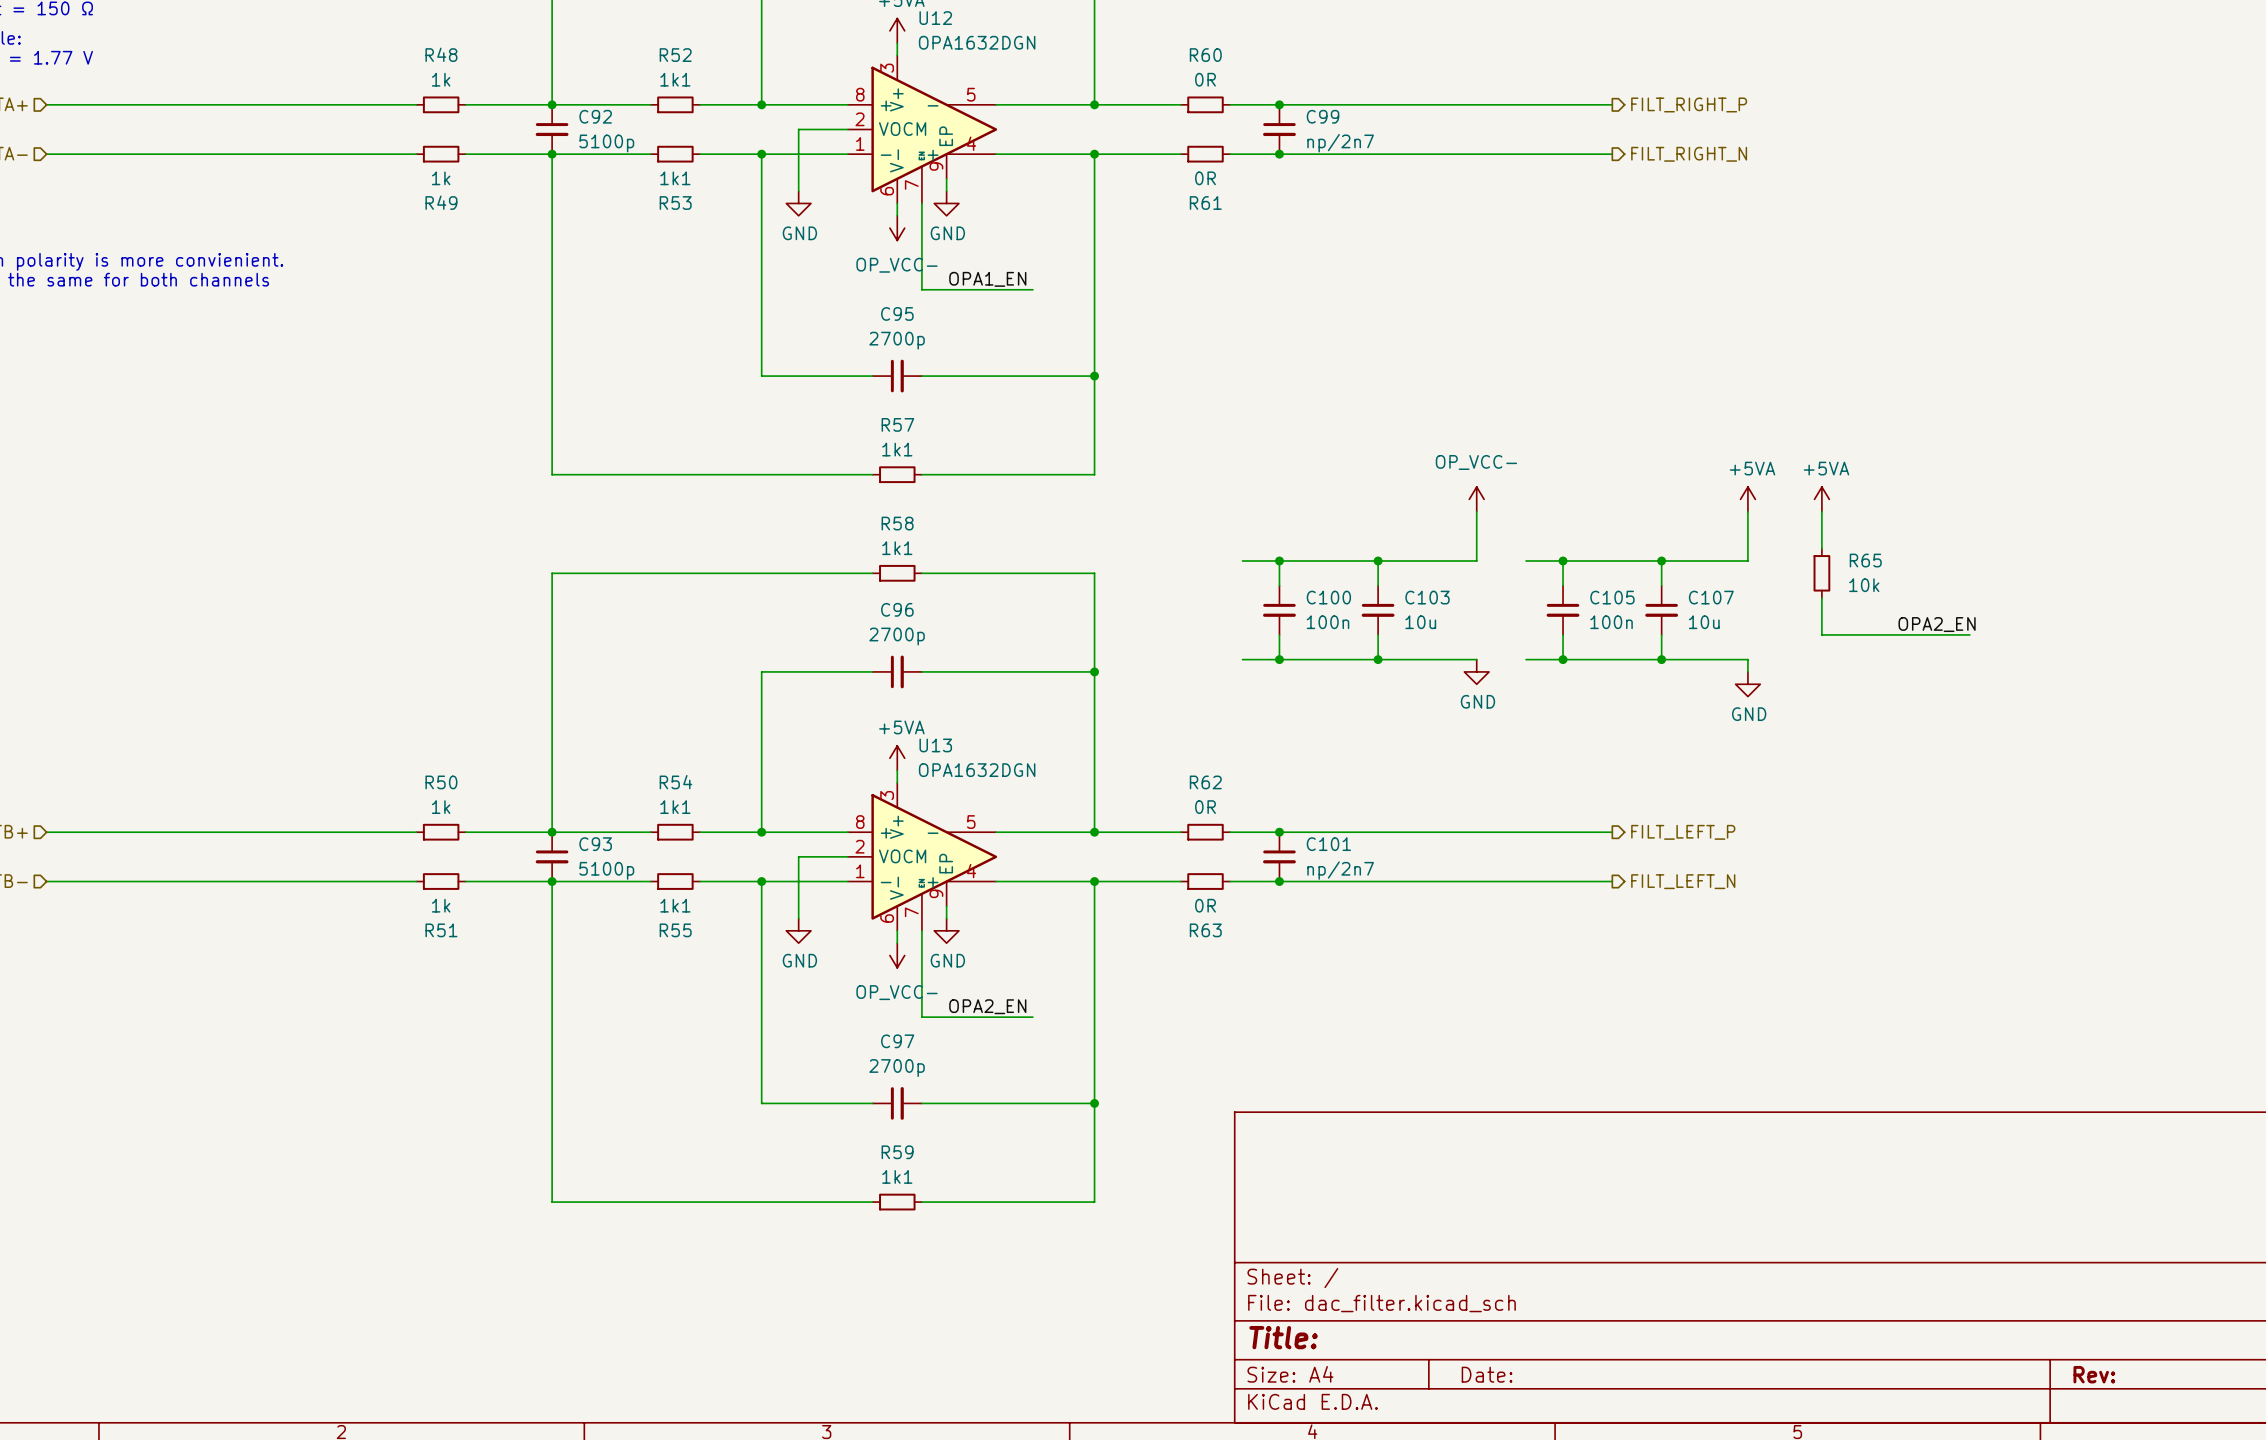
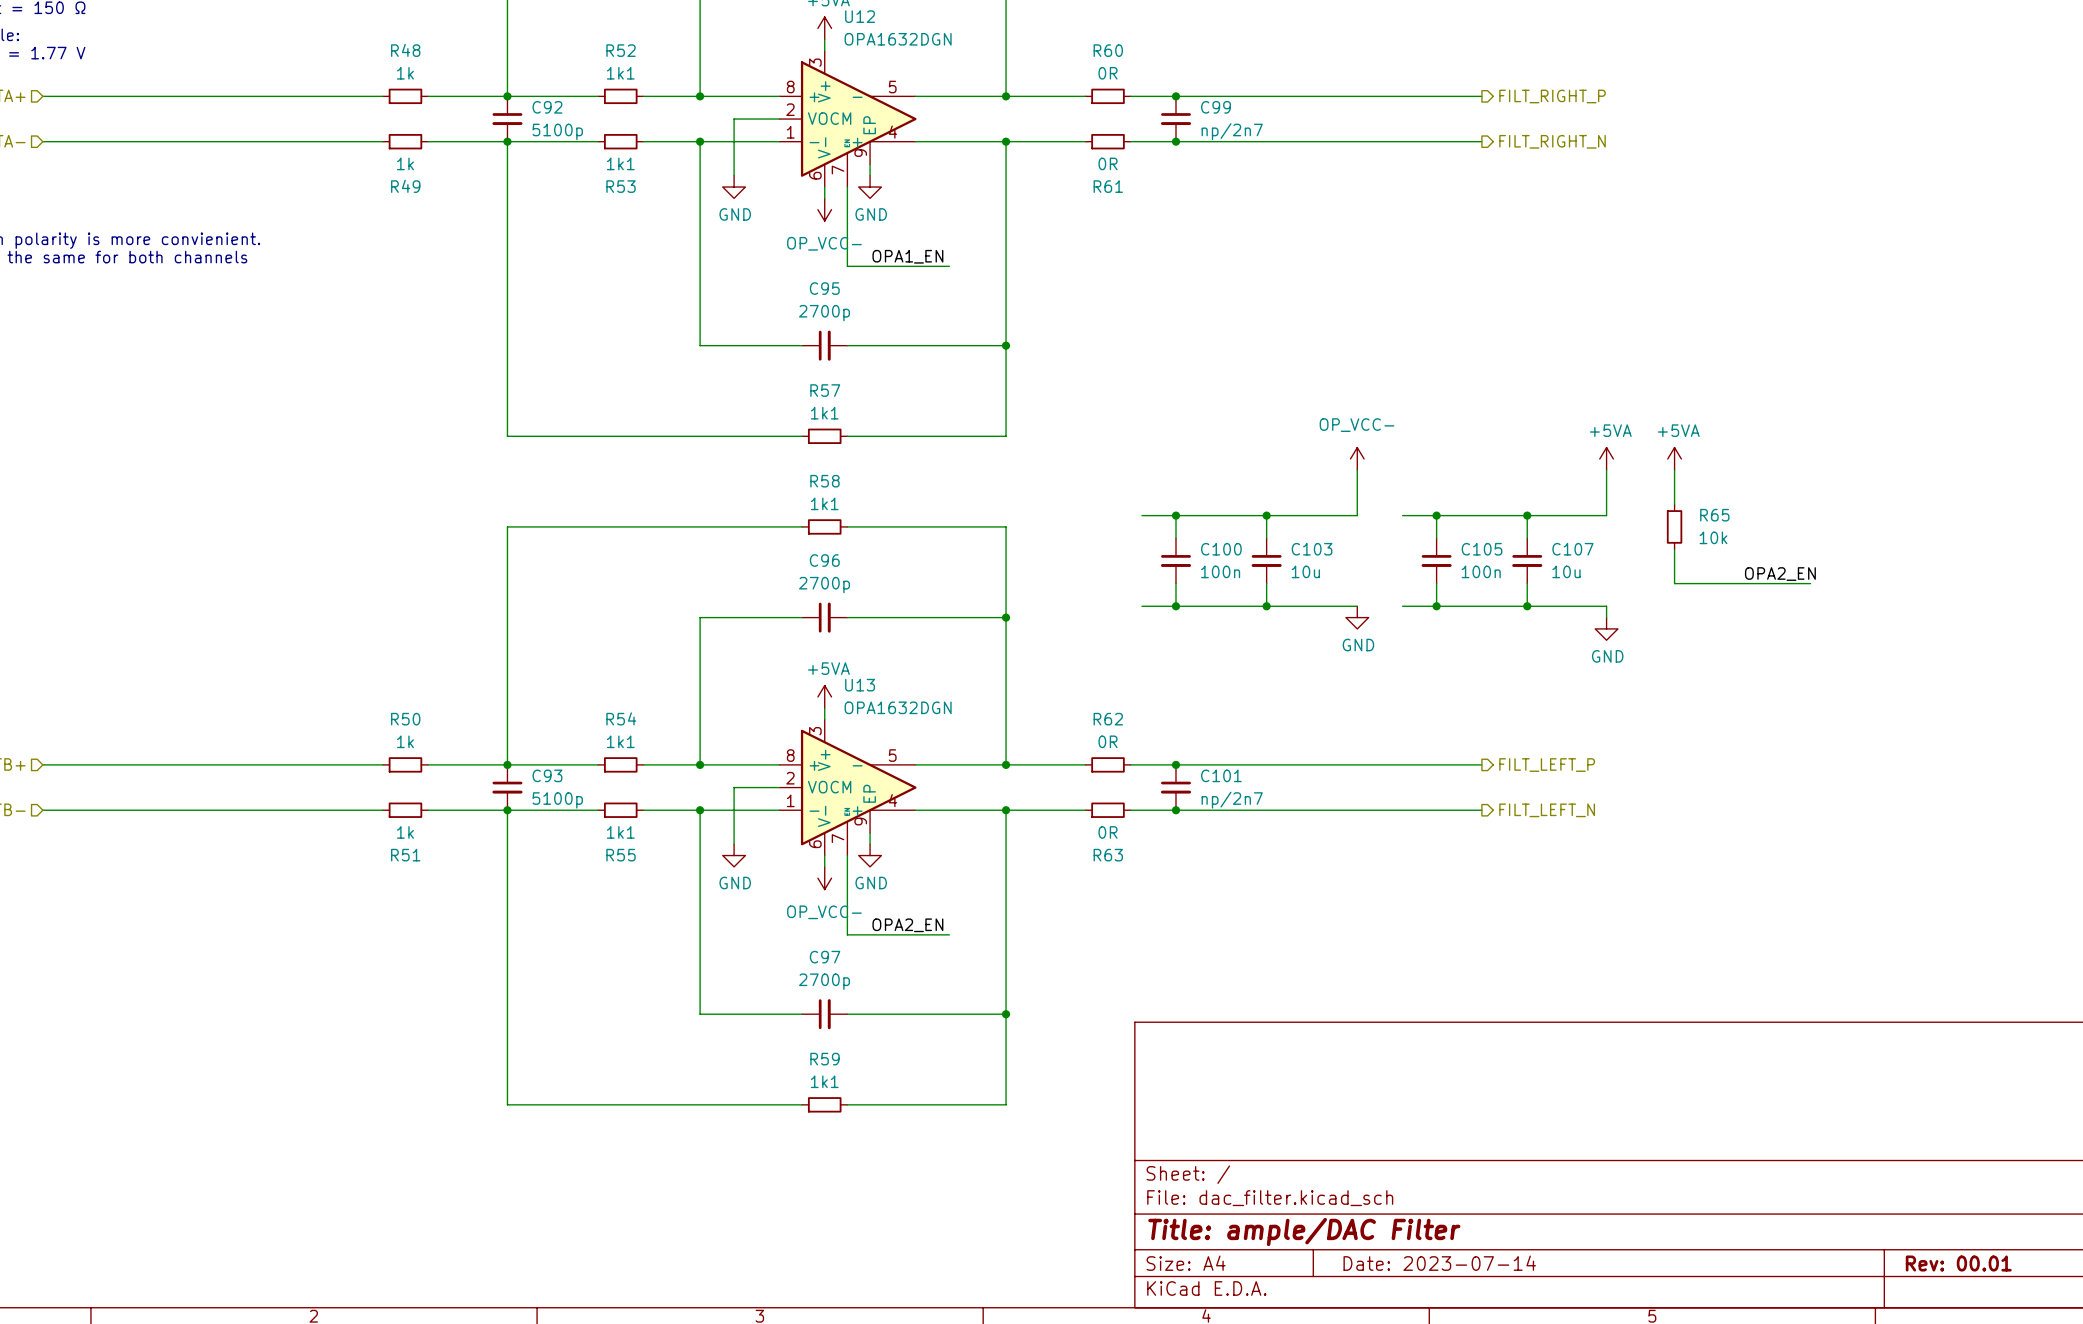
title block: Title: (1283, 1337) -> Title: ample/DAC Filter (1304, 1231)
title block: Date: (1487, 1374) -> Date: 2023-07-14 (1439, 1263)
title block: Rev: (2094, 1374) -> Rev: 00.01 (1958, 1263)

